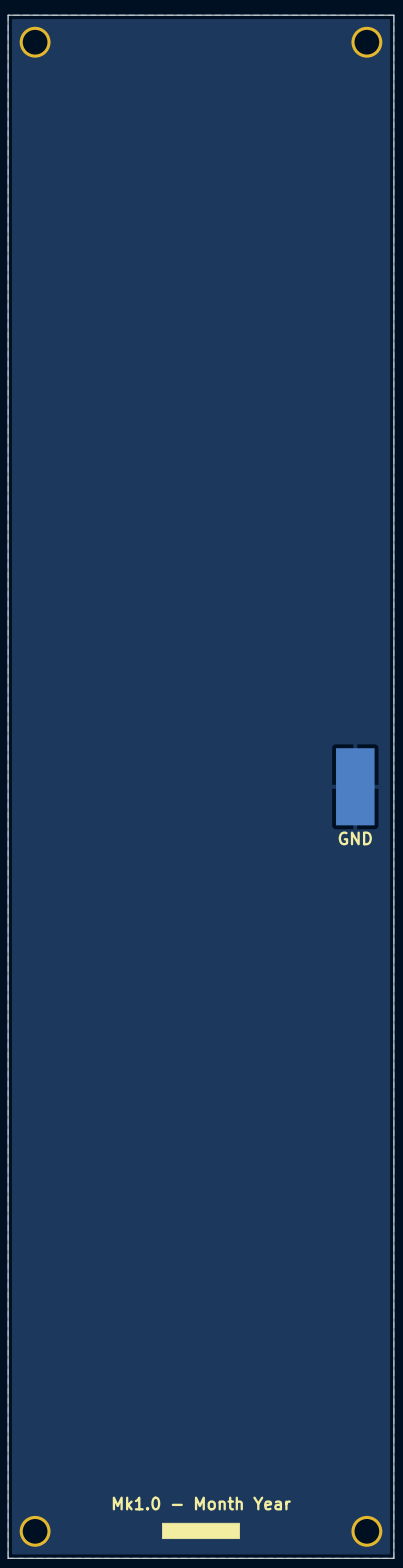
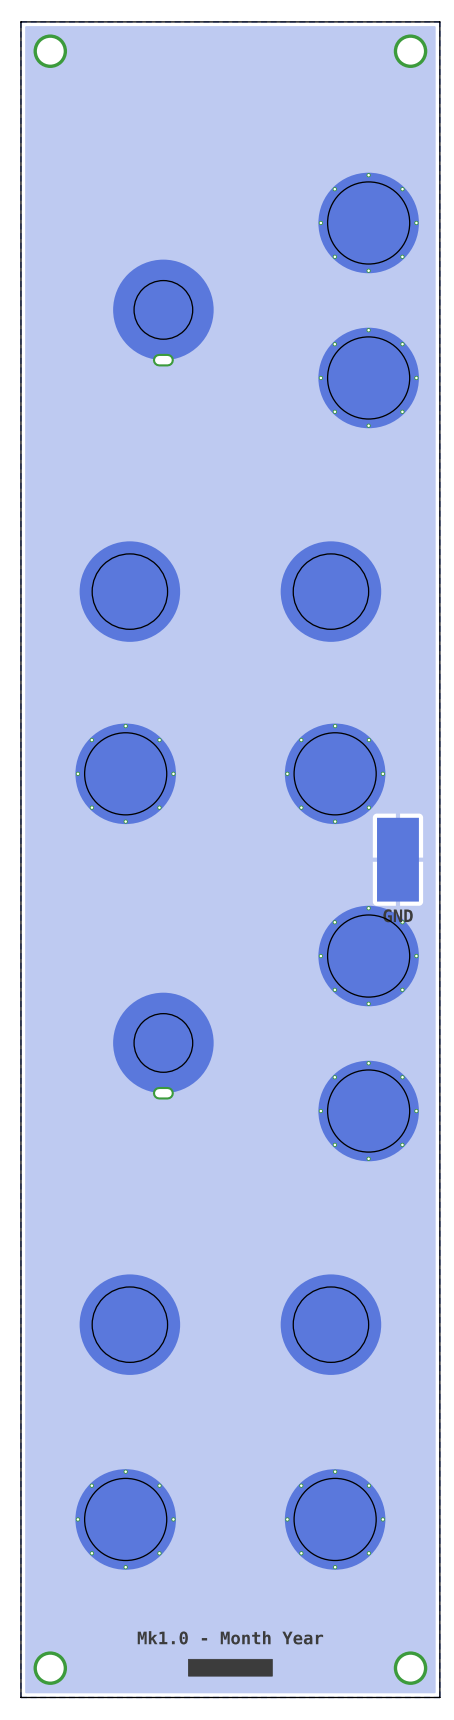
part: none -> (368, 222)
part: none -> (163, 313)
part: none -> (368, 377)
part: none -> (129, 591)
part: none -> (330, 591)
part: none -> (125, 773)
part: none -> (335, 773)
part: none -> (368, 956)
part: none -> (163, 1046)
part: none -> (368, 1111)
part: none -> (129, 1324)
part: none -> (330, 1324)
part: none -> (125, 1519)
part: none -> (335, 1519)

